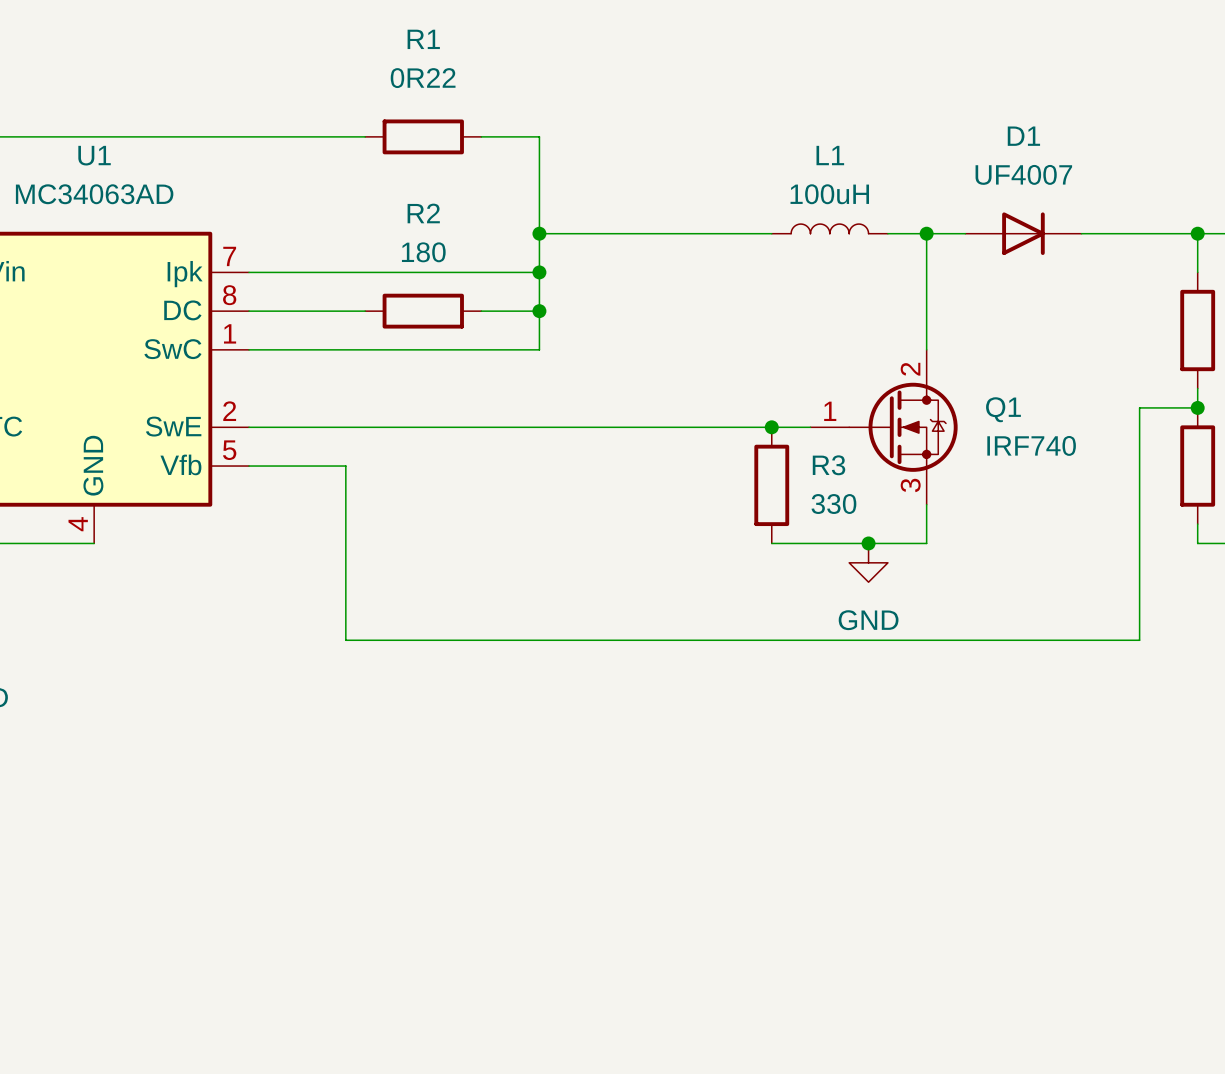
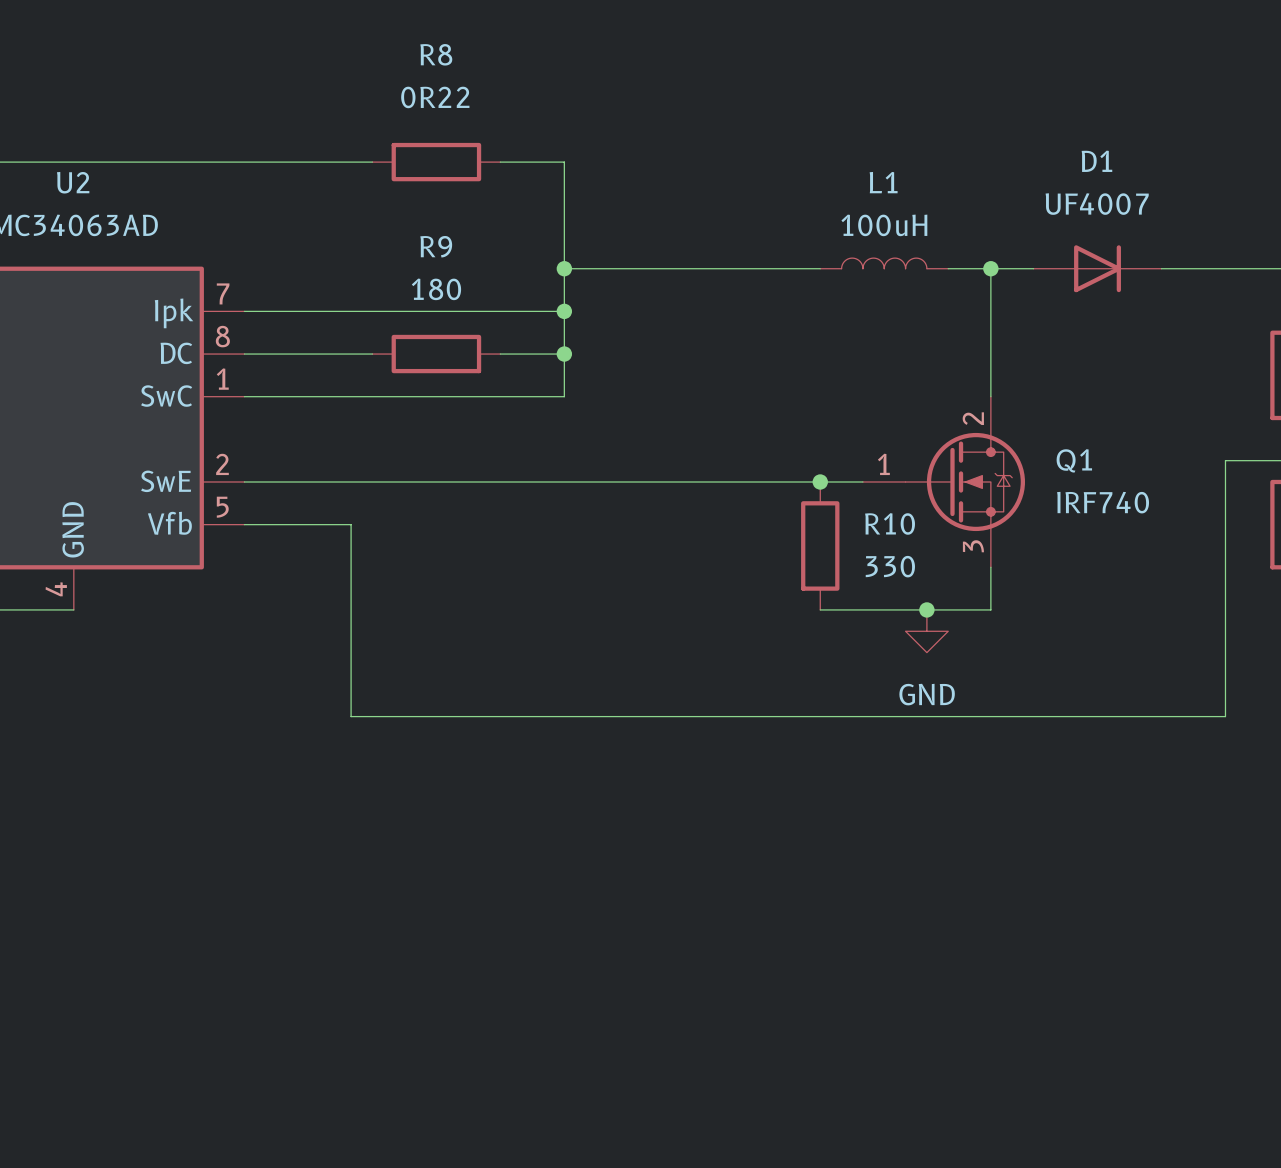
R1 name: R1 (423, 39) -> R8 (436, 54)
U1 name: U1 (94, 155) -> U2 (73, 182)
R2 name: R2 (423, 213) -> R9 (436, 246)
R3 name: R3 (829, 465) -> R10 (890, 523)

